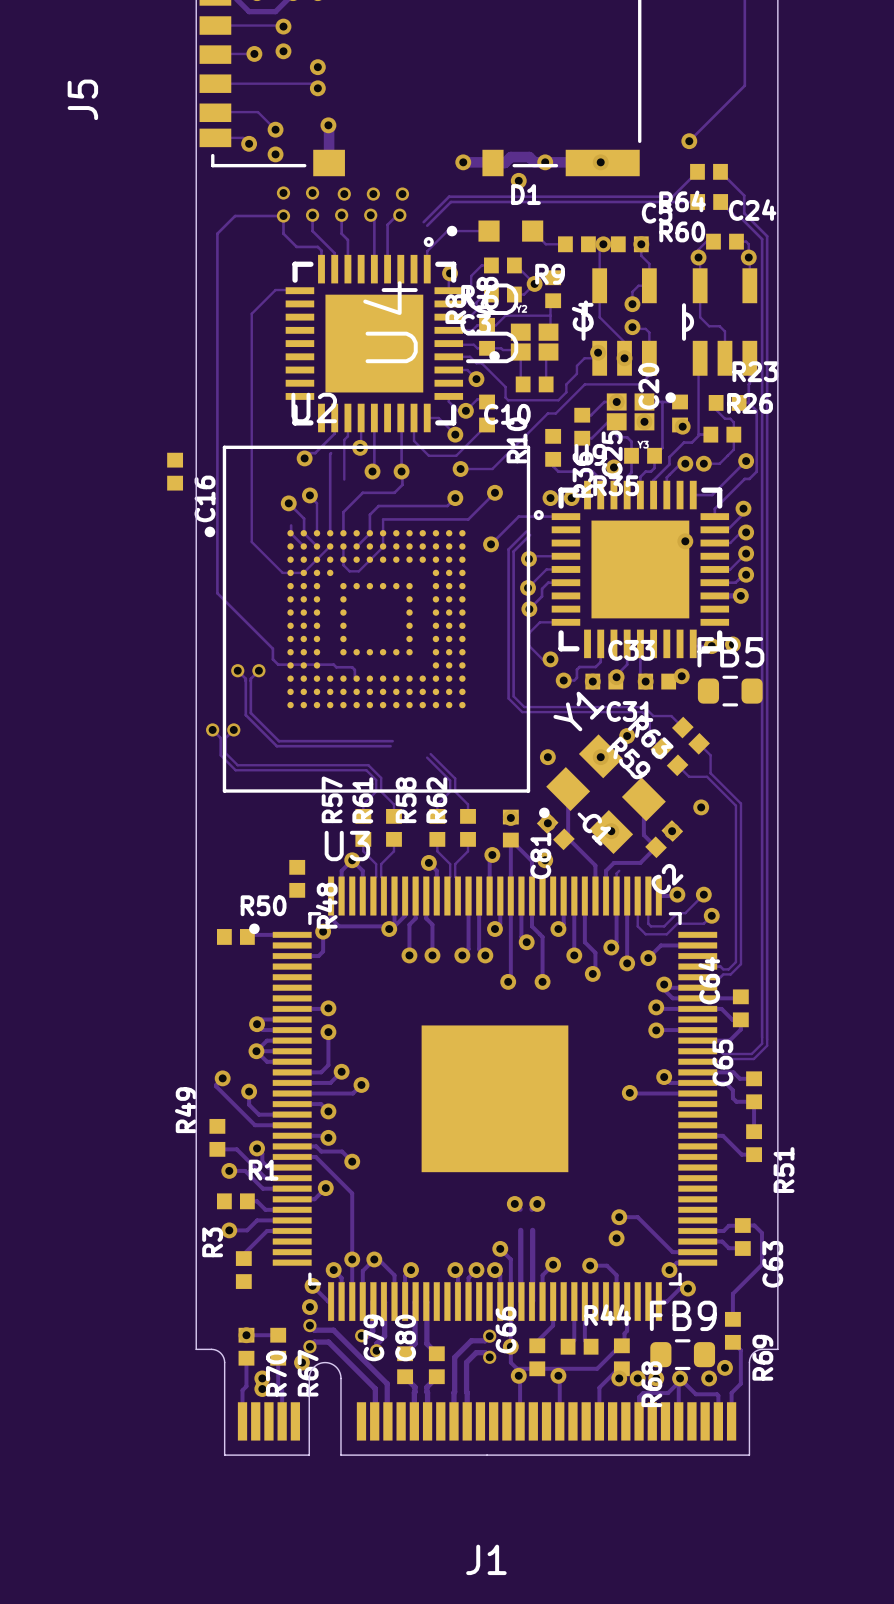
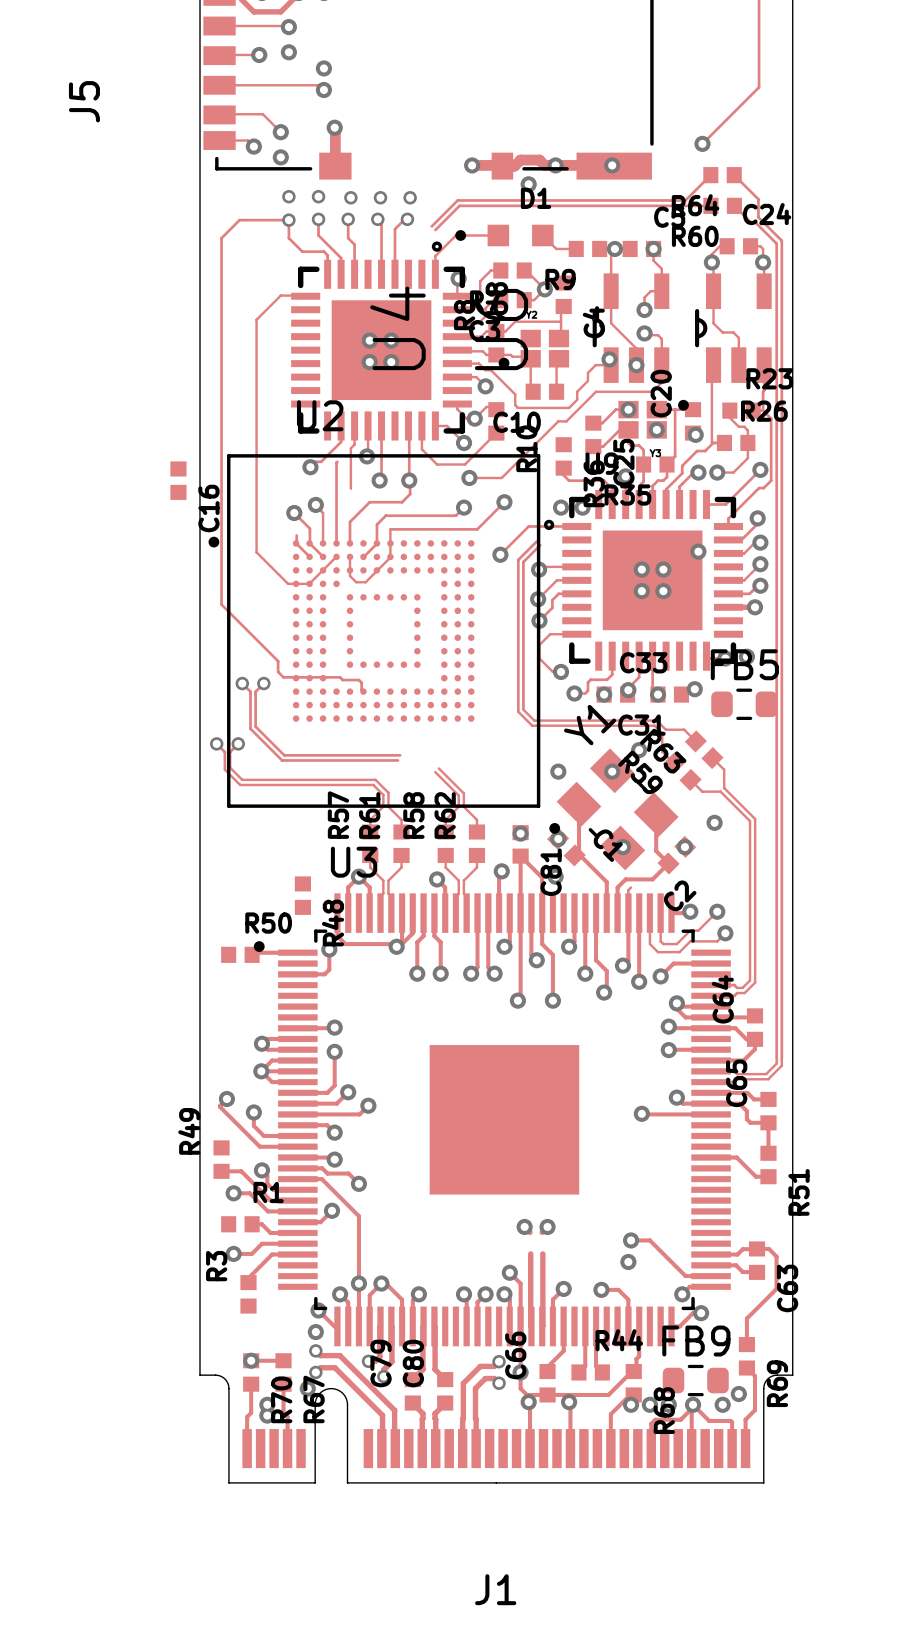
via: none -> (369, 340)
via: none -> (391, 340)
via: none -> (369, 362)
via: none -> (391, 362)
via: none -> (641, 569)
via: none -> (663, 569)
via: none -> (641, 591)
via: none -> (663, 591)

